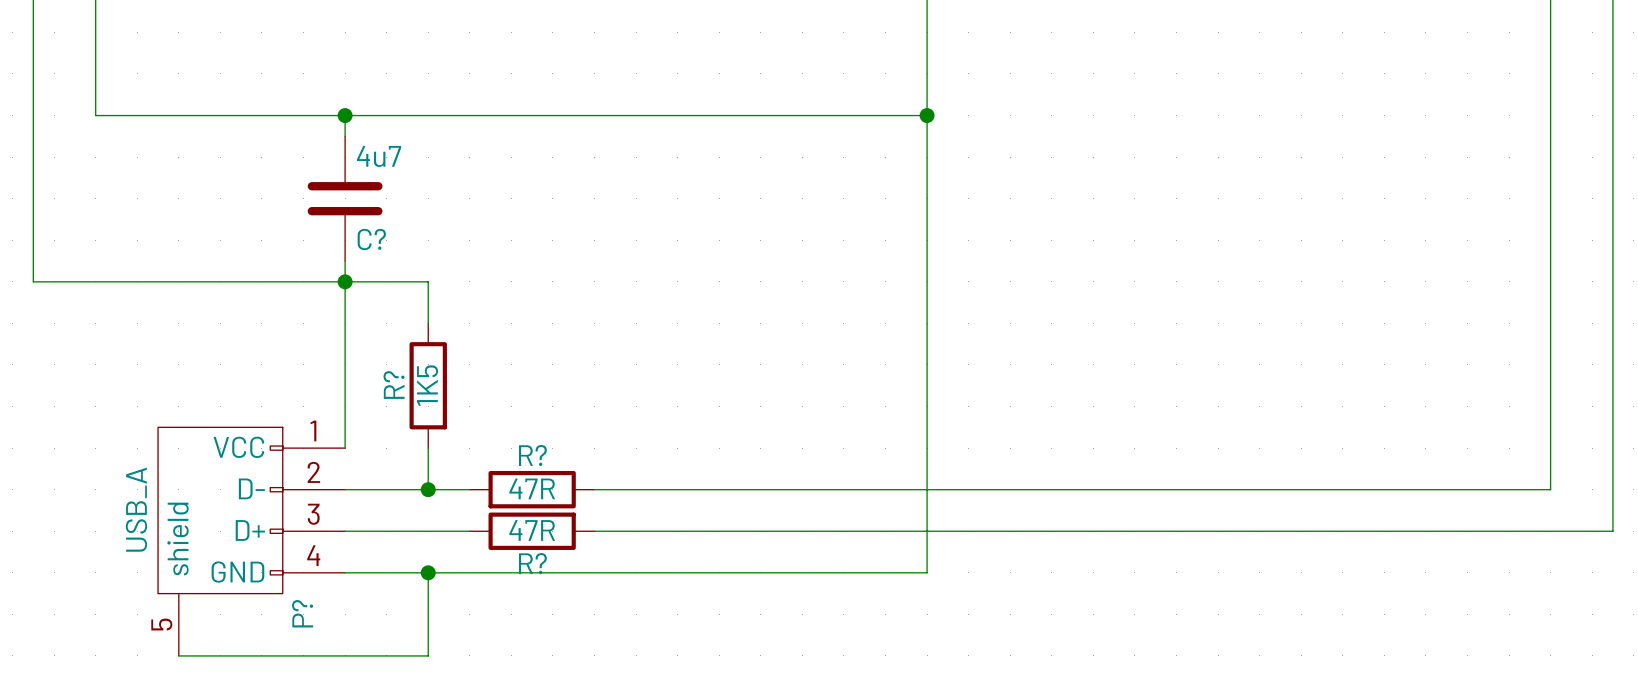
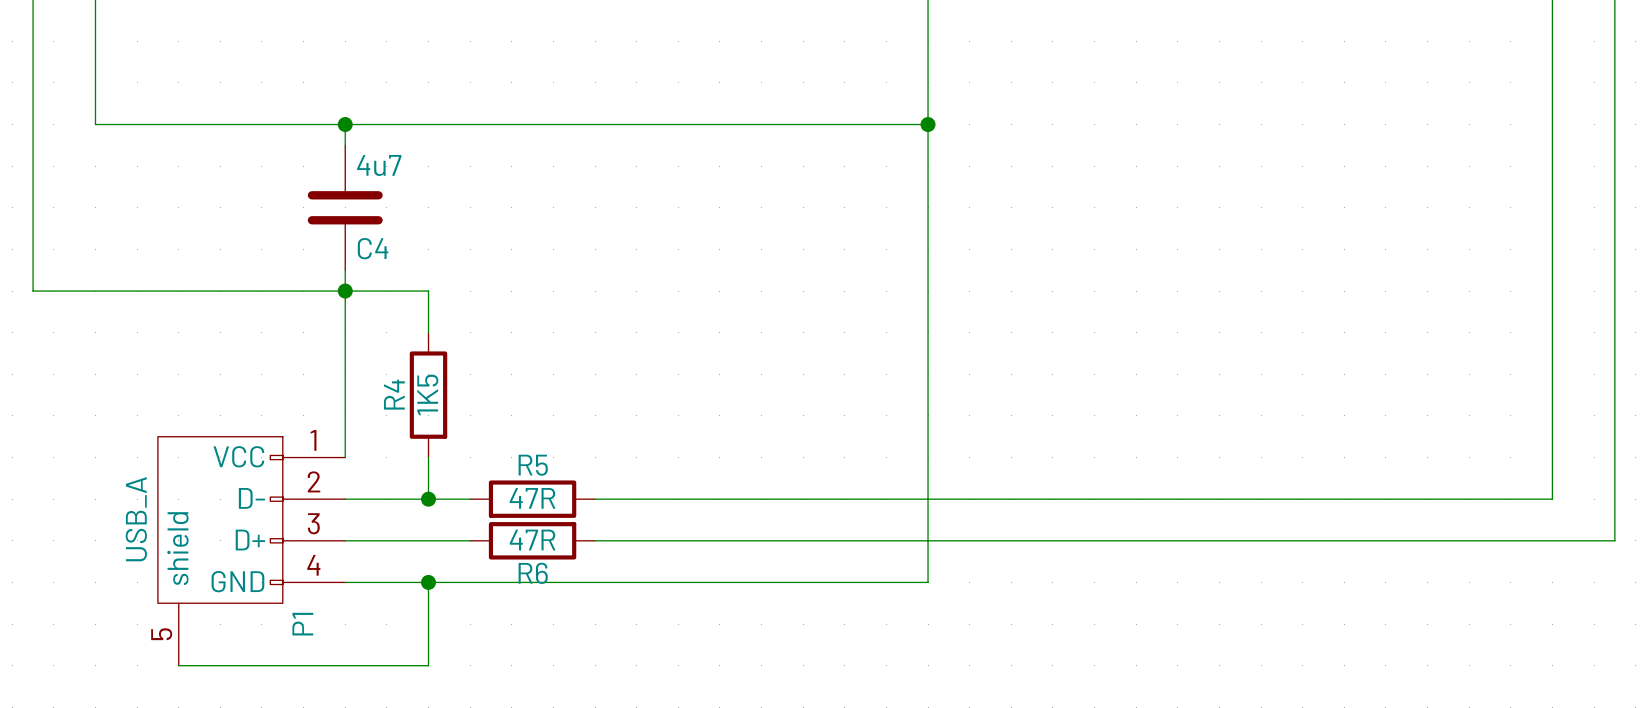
C? name: C? (371, 239) -> C4 (373, 248)
R? name: R? (394, 385) -> R4 (394, 394)
R? name: R? (532, 455) -> R5 (533, 465)
R? name: R? (532, 563) -> R6 (533, 573)
P? name: P? (302, 613) -> P1 (302, 624)

